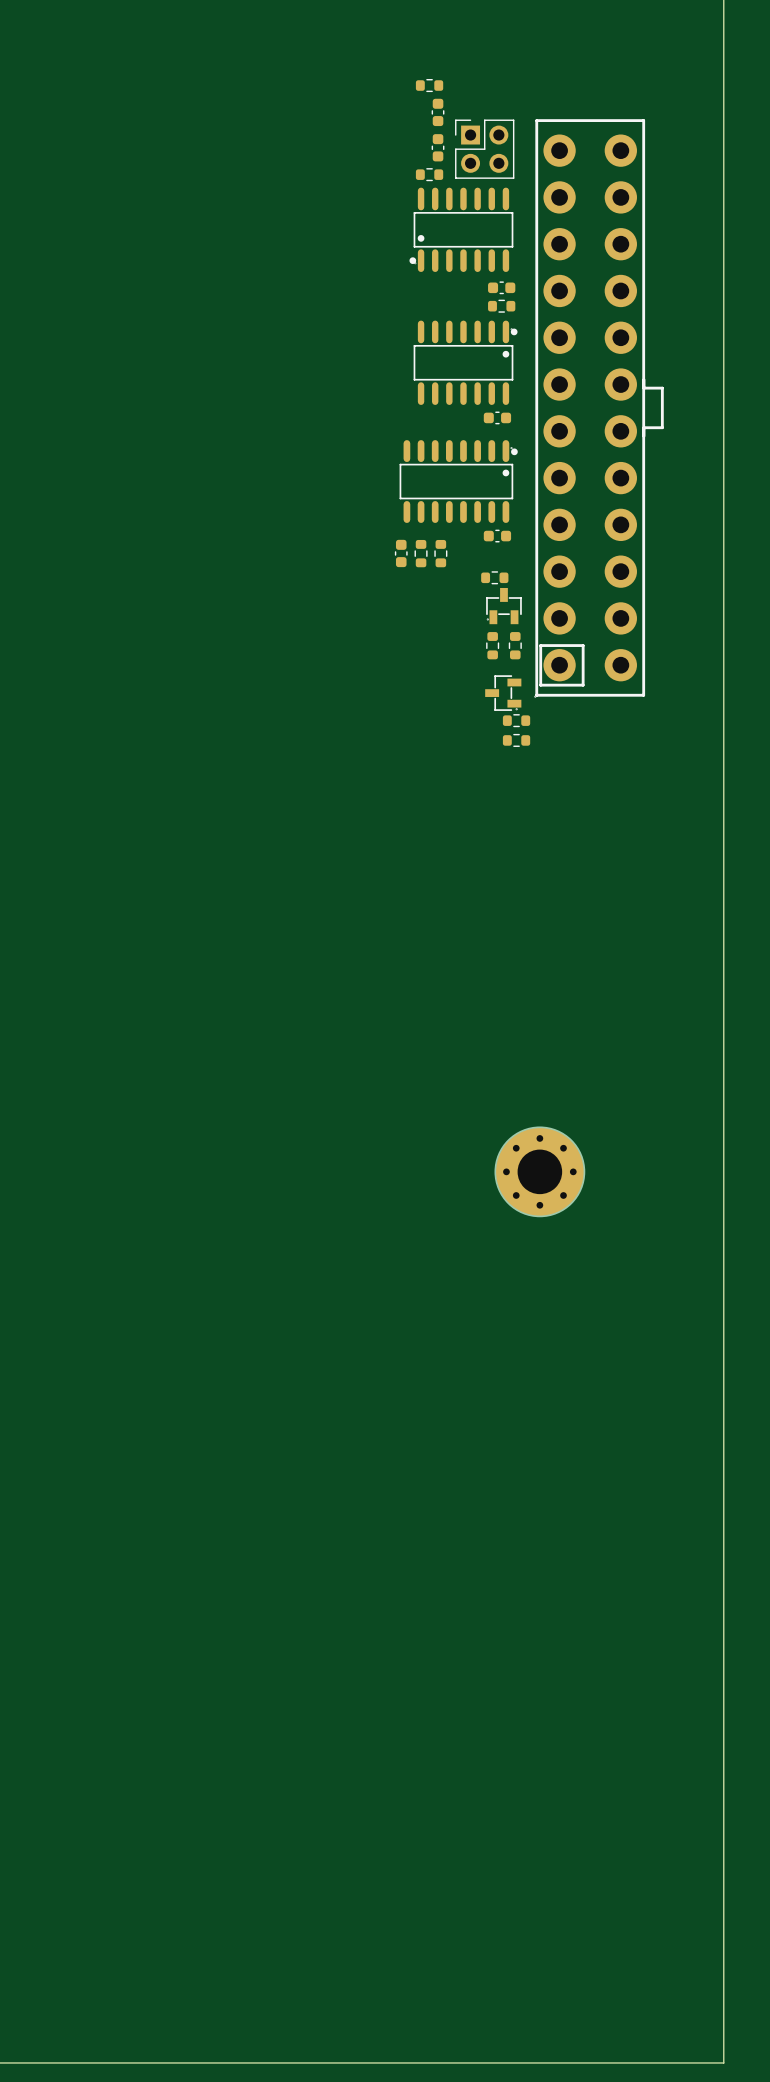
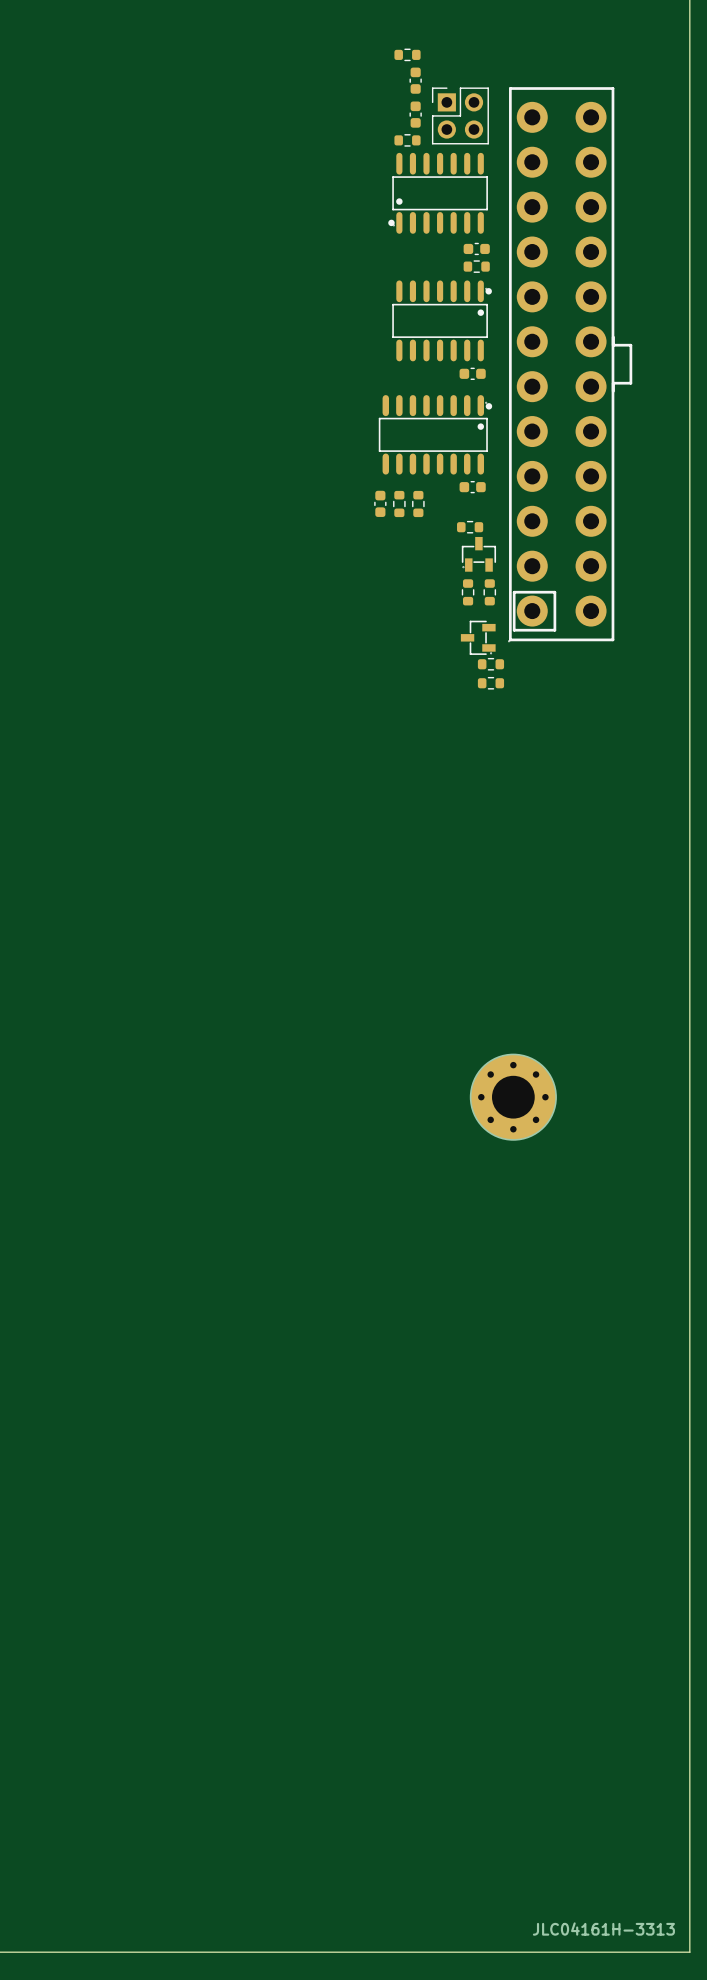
text: none -> JLC04161H-3313 (603, 1929)

